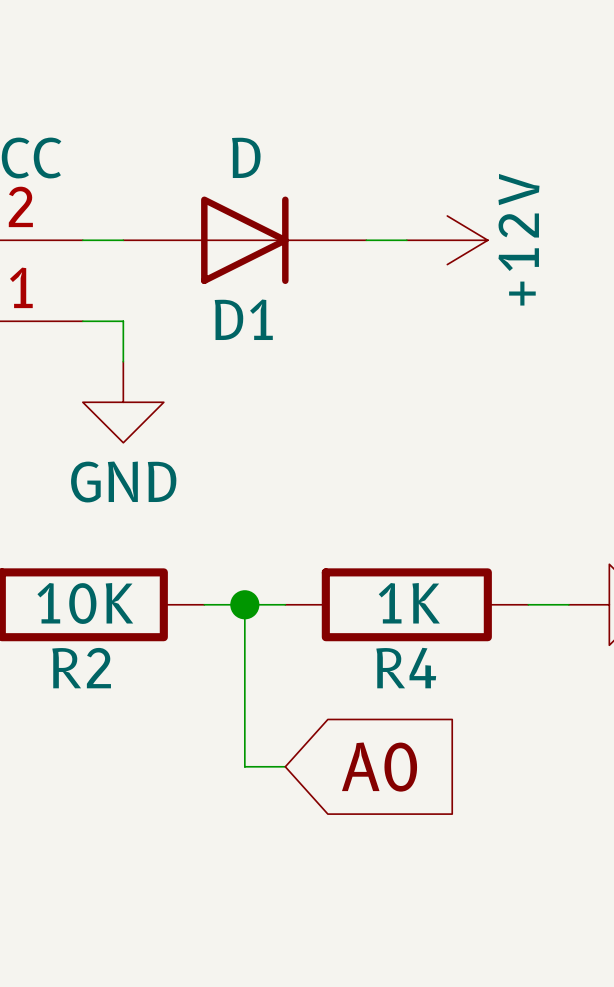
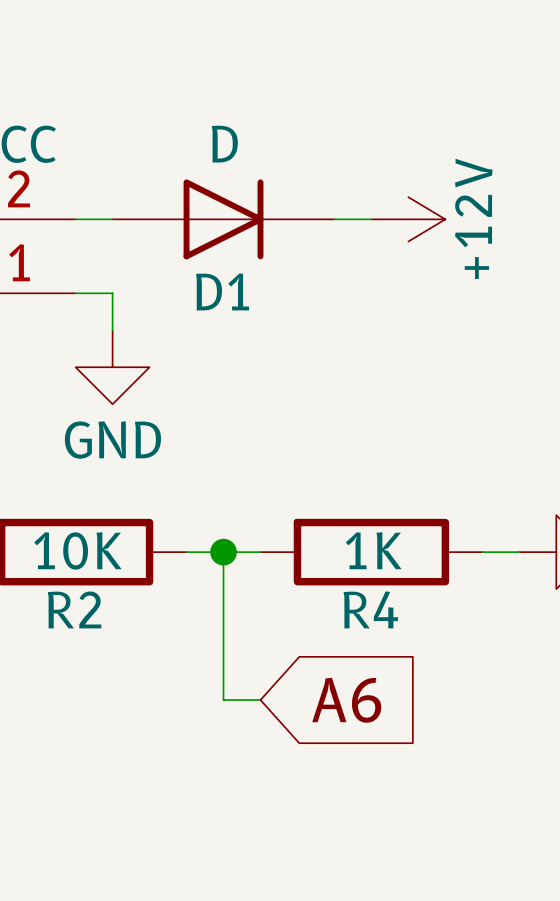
global label: A0 (379, 767) -> A6 (346, 700)

